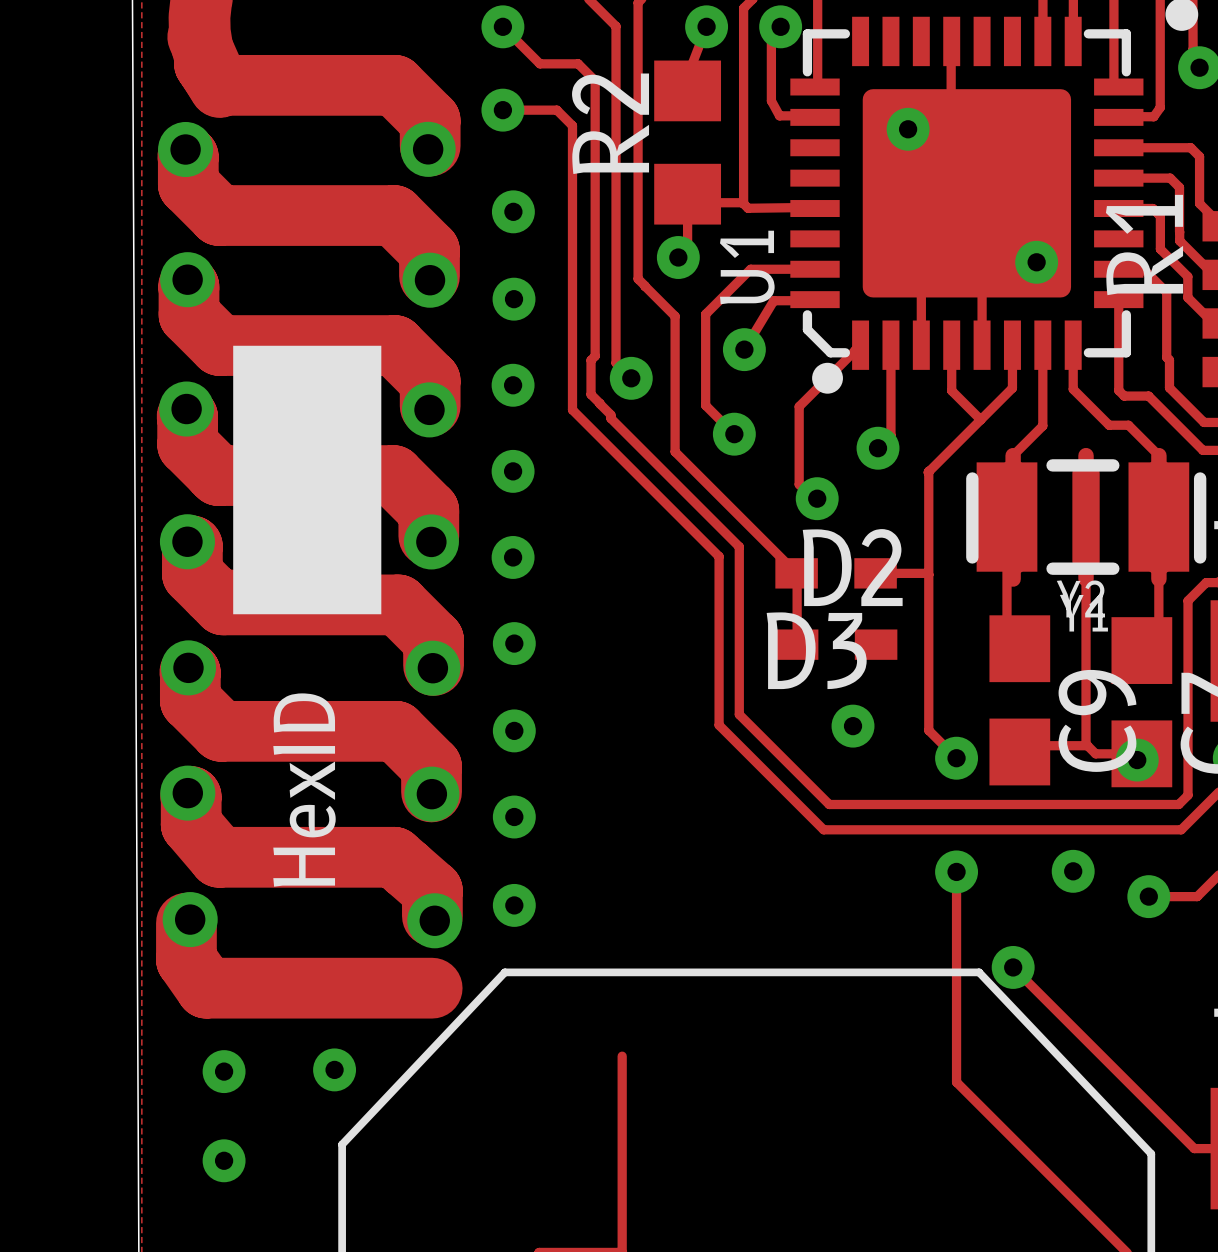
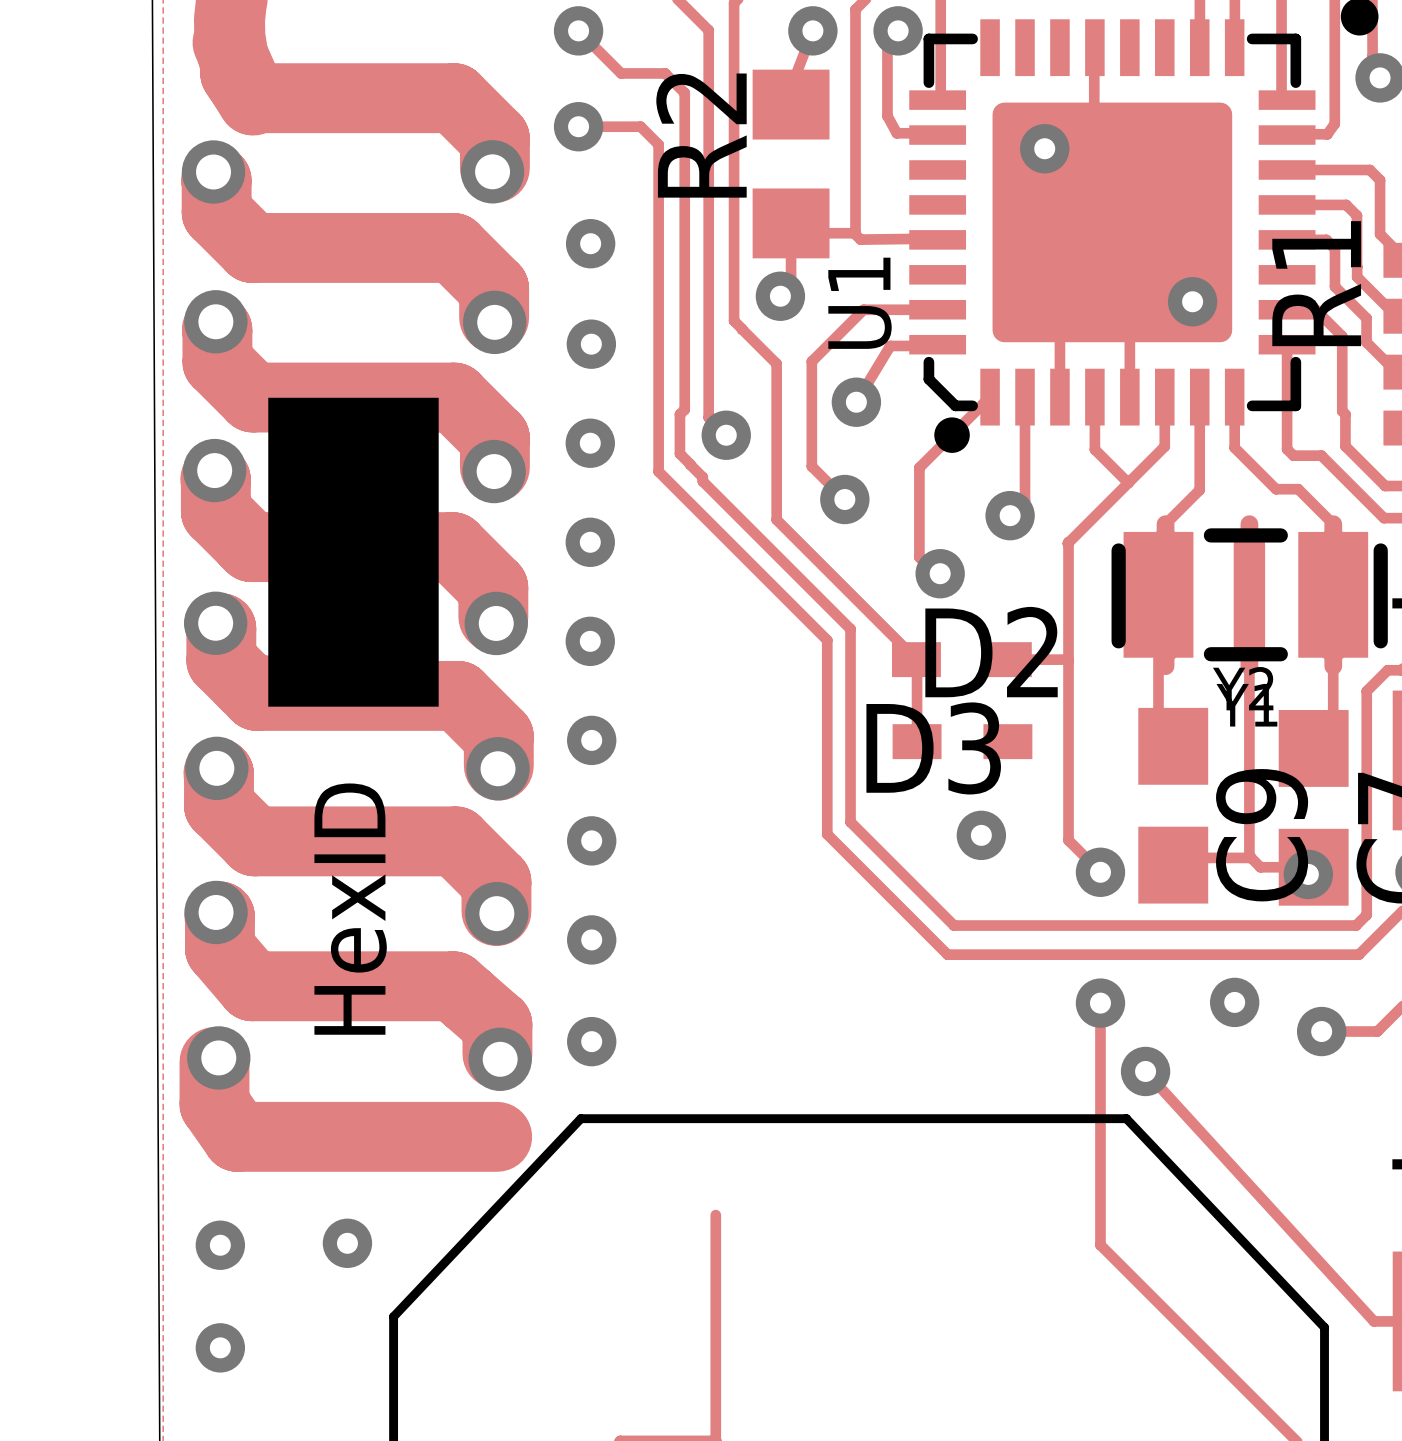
track: (1013, 967) (1194, 1148) -> (1145, 1071) (1374, 1321)
via position: (1013, 967) -> (1145, 1071)
via position: (334, 1069) -> (347, 1243)
via position: (224, 1071) -> (220, 1245)
via position: (224, 1160) -> (220, 1347)

